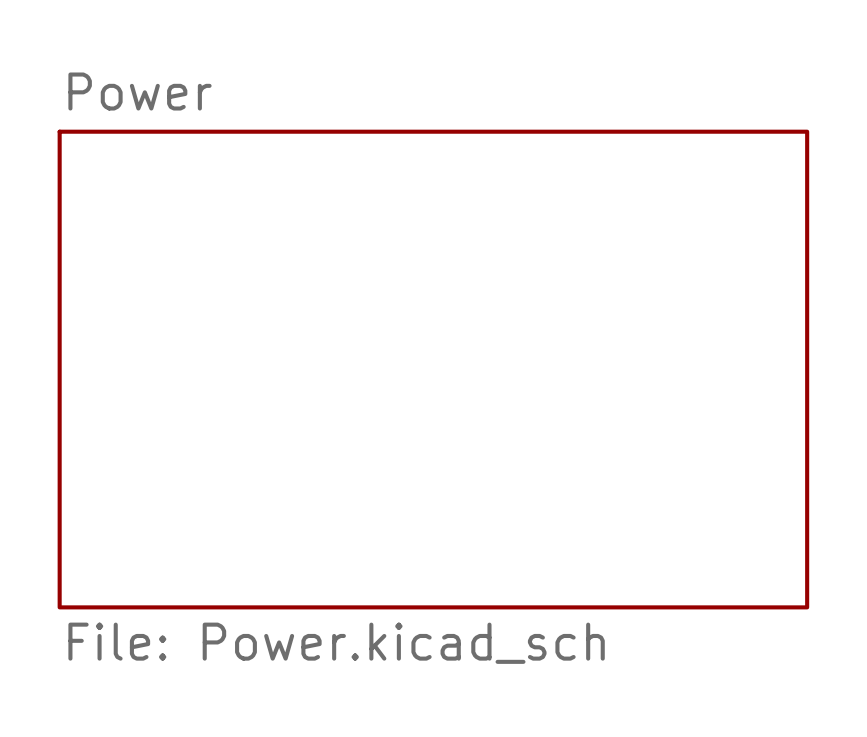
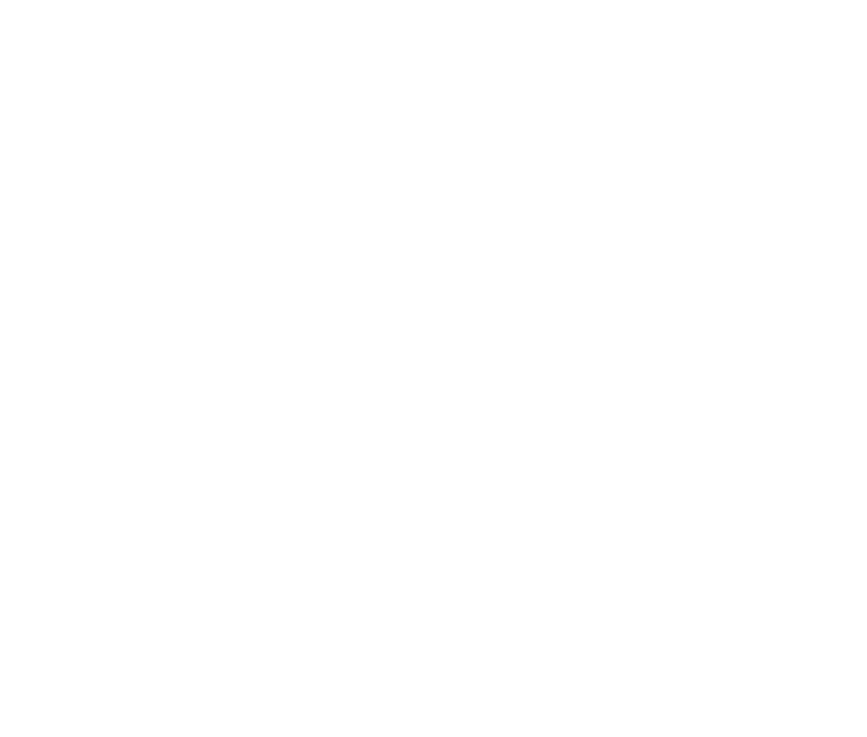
sheet Power: File: Power.kicad_sch (433, 369) -> none

